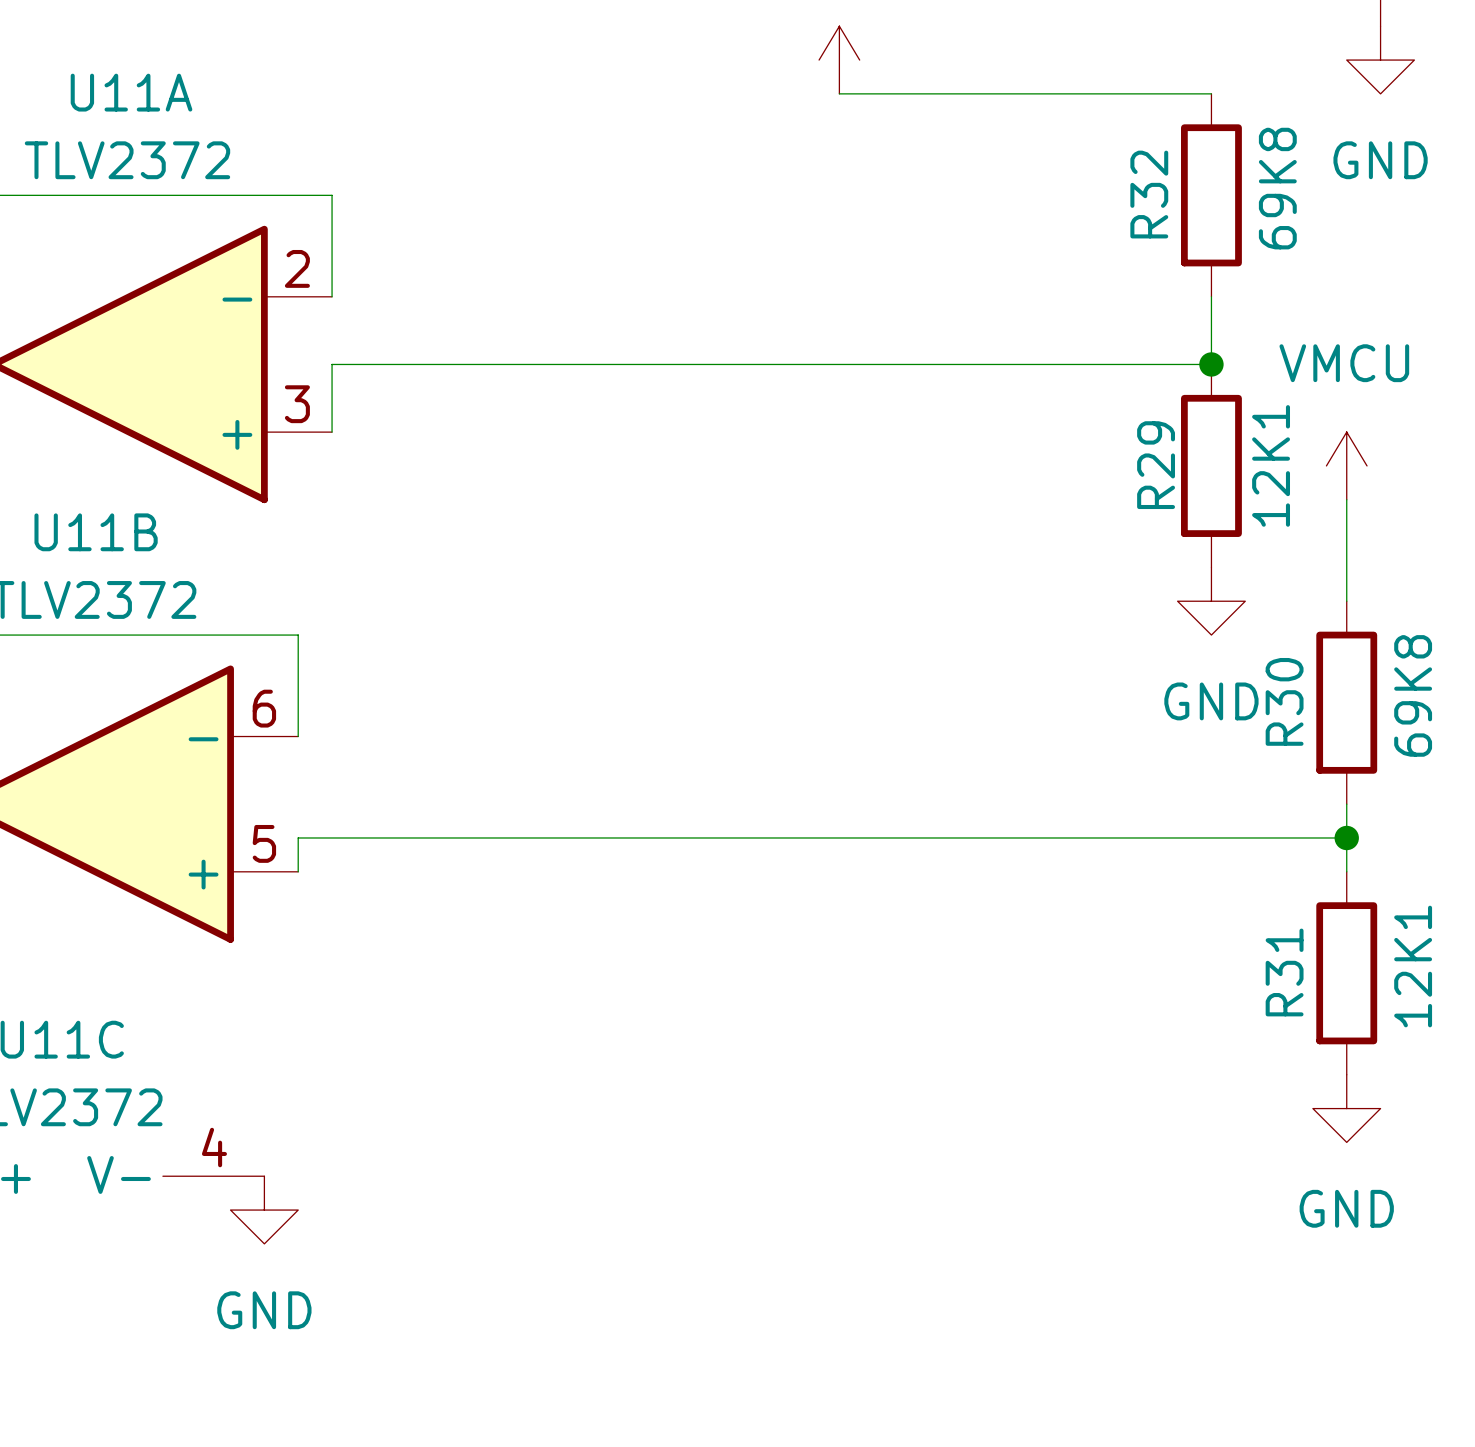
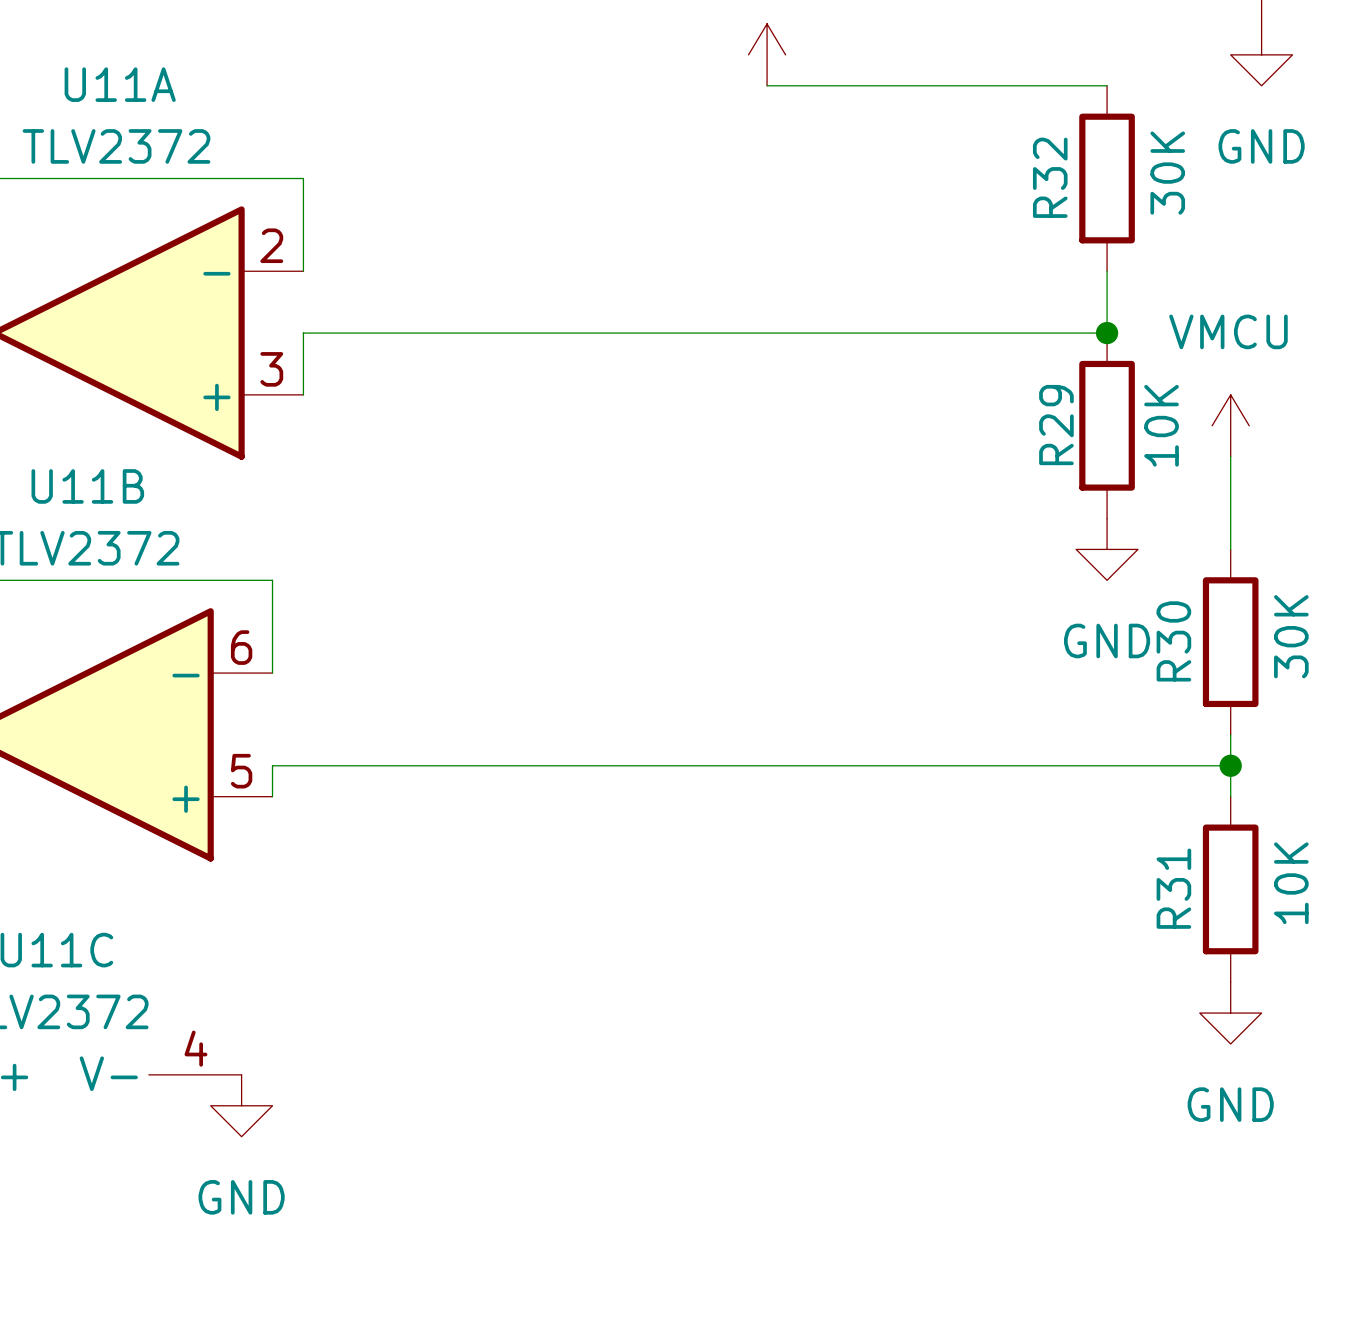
R32 value: 69K8 (1277, 188) -> 30K (1167, 173)
R29 value: 12K1 (1271, 465) -> 10K (1161, 425)
R30 value: 69K8 (1413, 695) -> 30K (1291, 636)
R31 value: 12K1 (1413, 966) -> 10K (1291, 883)

